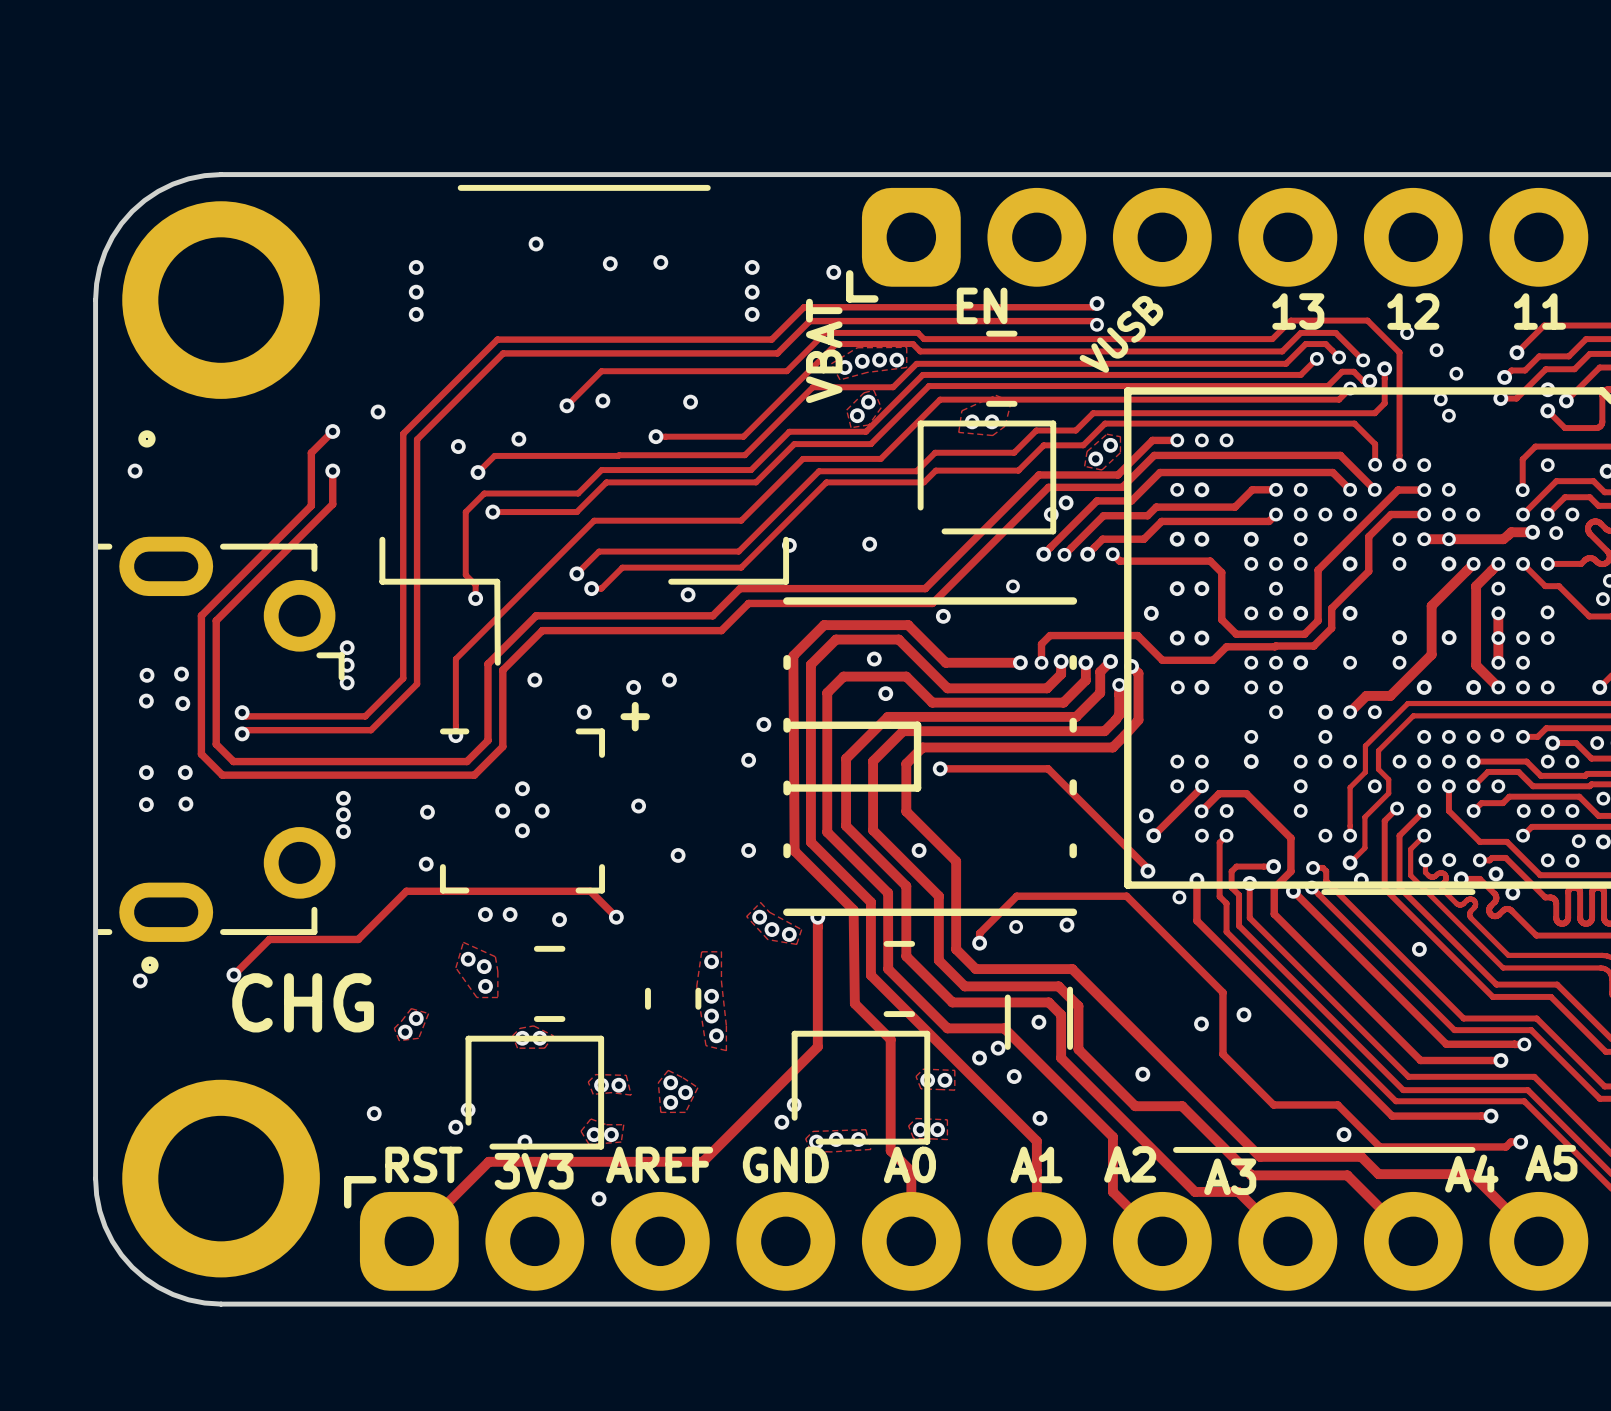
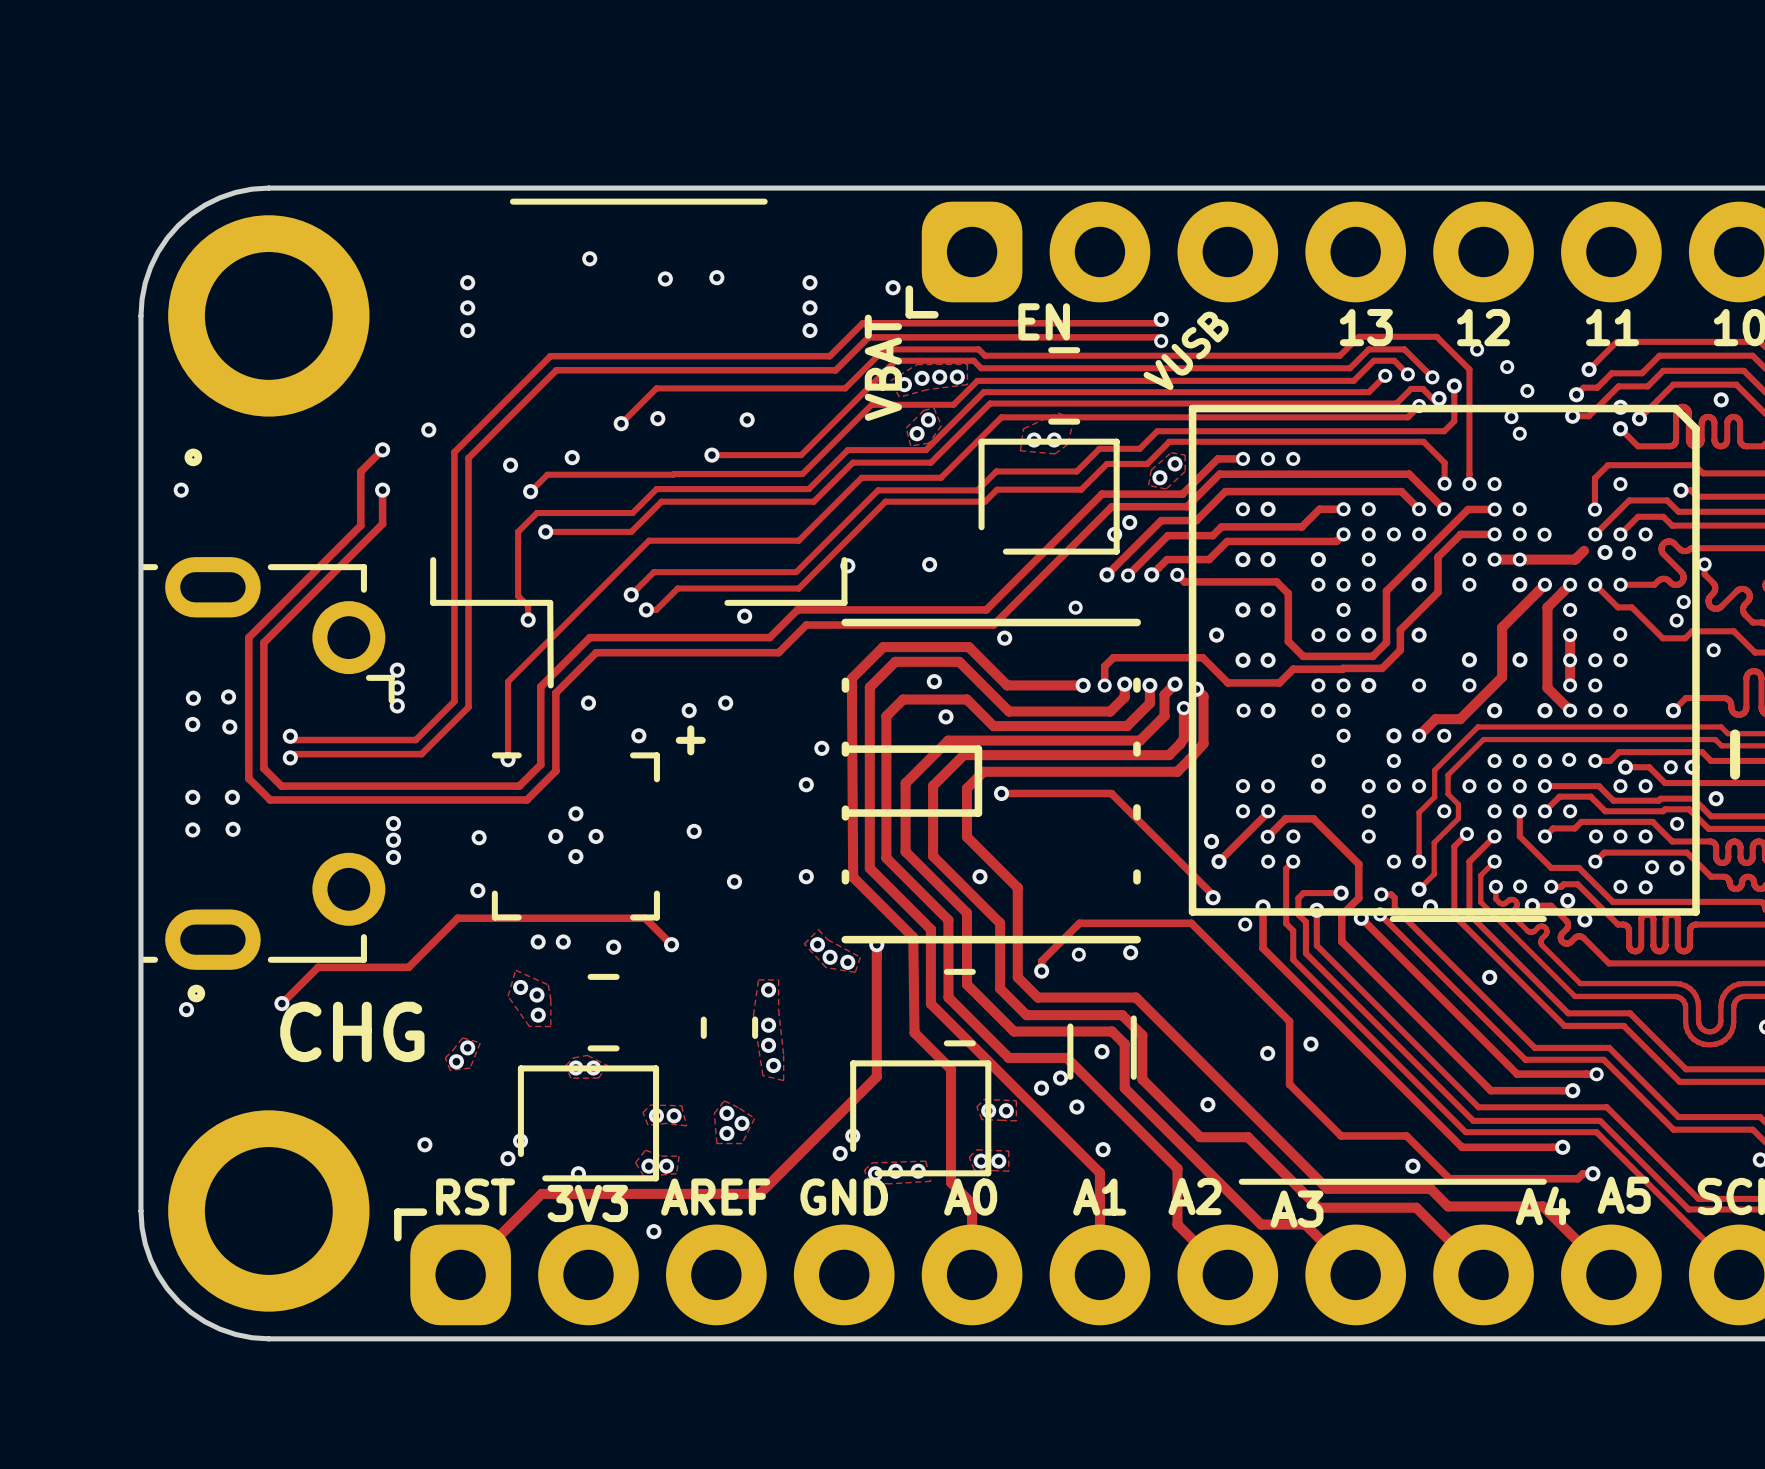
track: (1532, 532) (1511, 532) (1503, 539) -> (1584, 550) (1575, 559)

